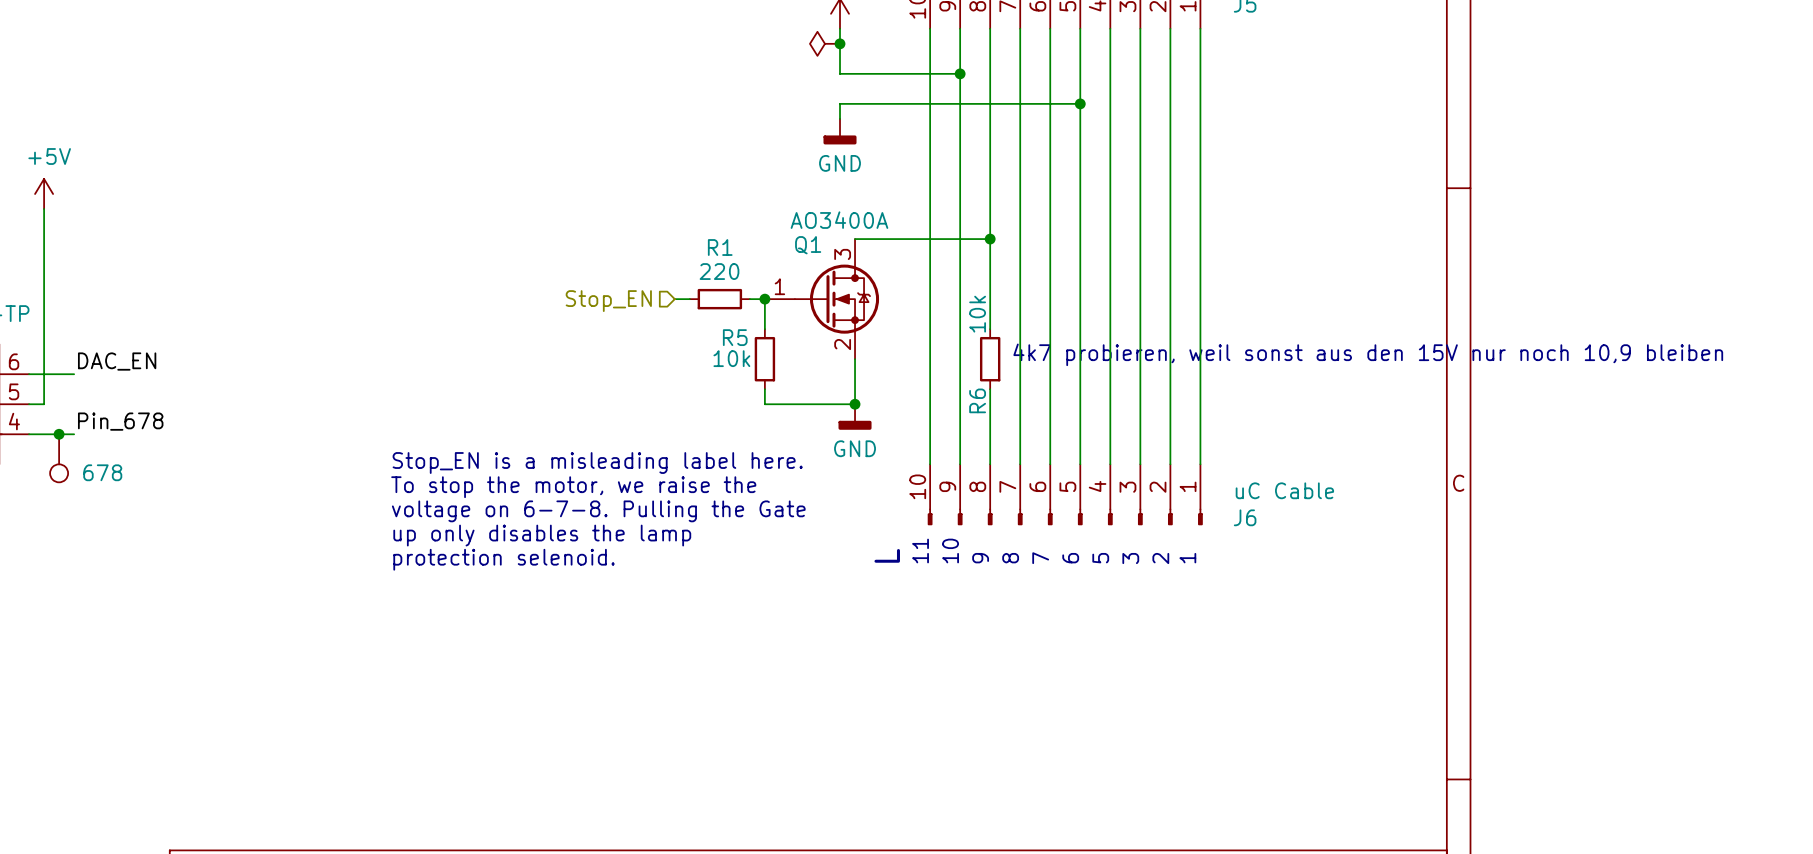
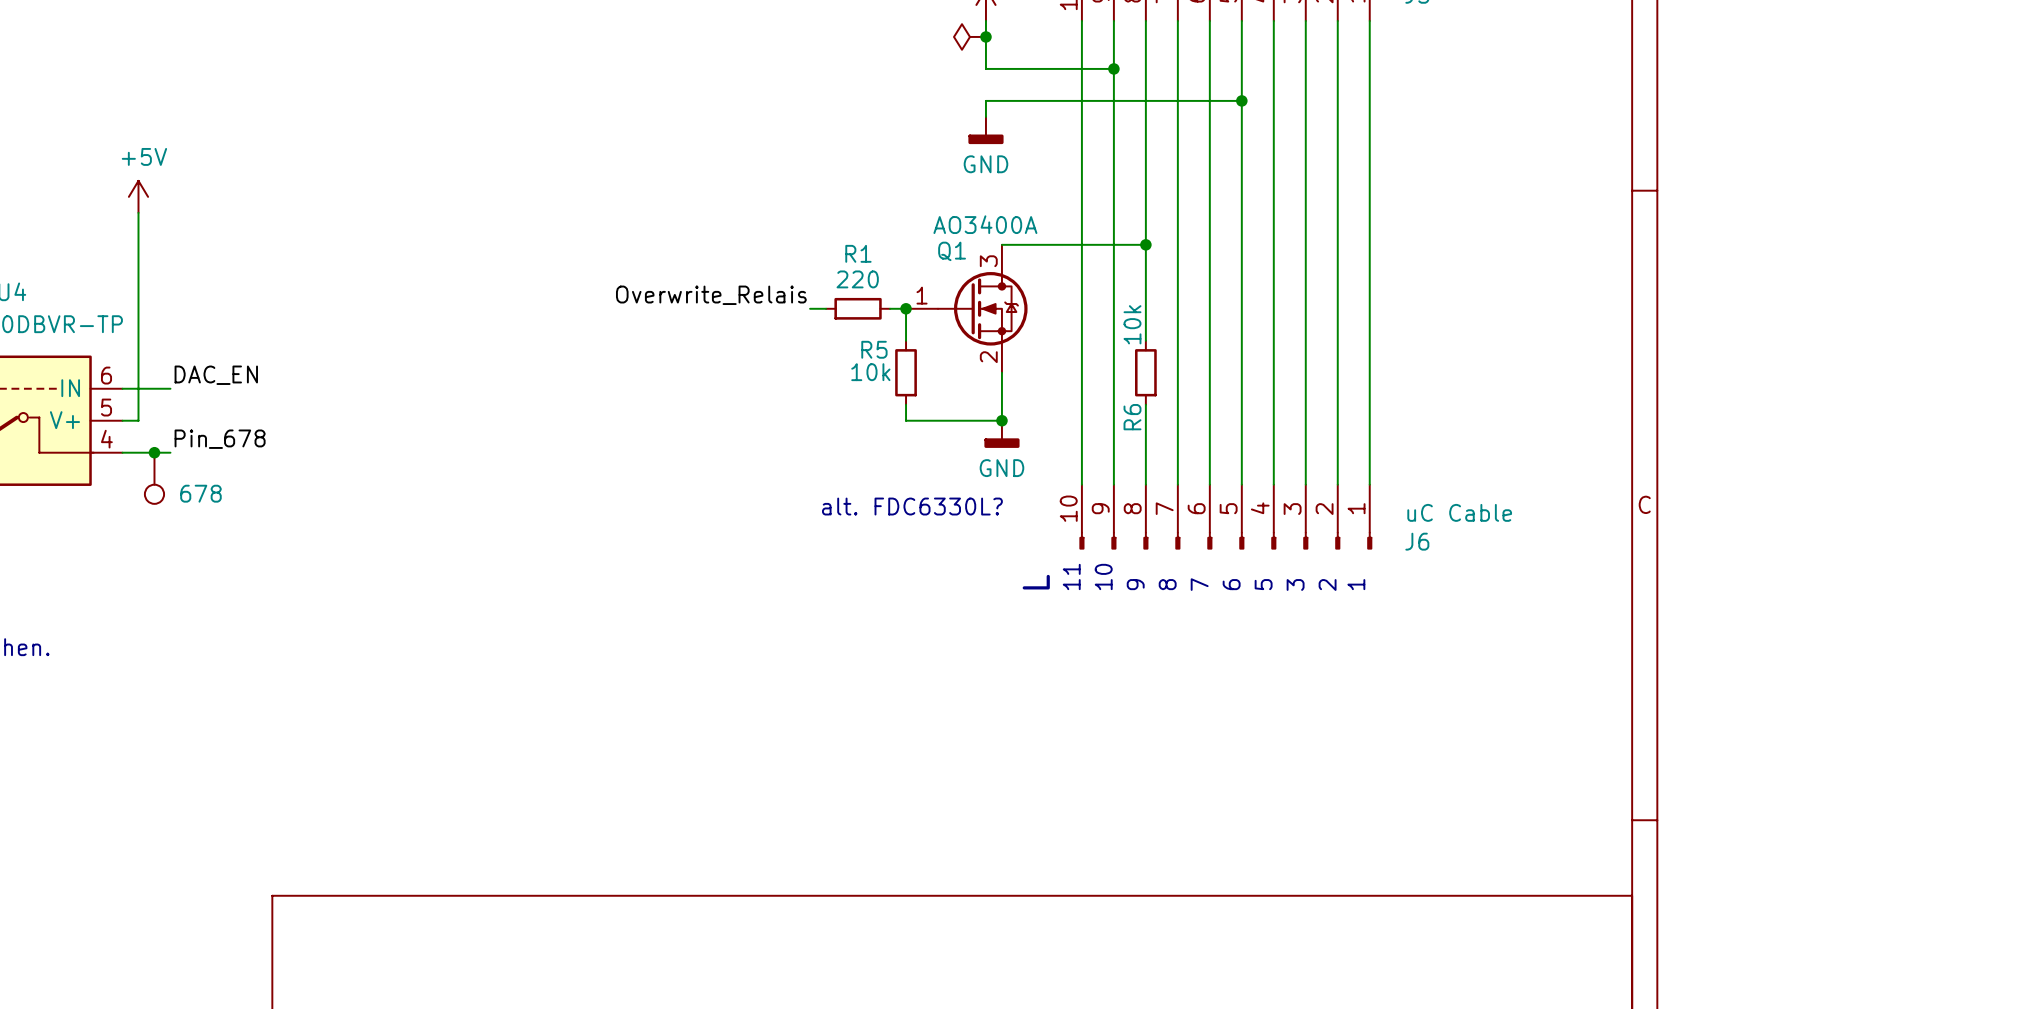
label: none -> Overwrite_Relais (711, 295)
hierarchical label: Stop_EN (608, 301) -> none
text: 4k7 probieren, weil sonst aus den 15V nur noch 10,9 bleiben (1368, 354) -> none
text: Stop_EN is a misleading label here. (597, 463) -> none
text: none -> alt. FDC6330L? (912, 506)
text: To stop the motor, we raise the (573, 487) -> none
text: voltage on 6-7-8. Pulling the Gate (598, 511) -> none
text: up only disables the lamp (542, 535) -> none
text: protection selenoid. (504, 559) -> none

